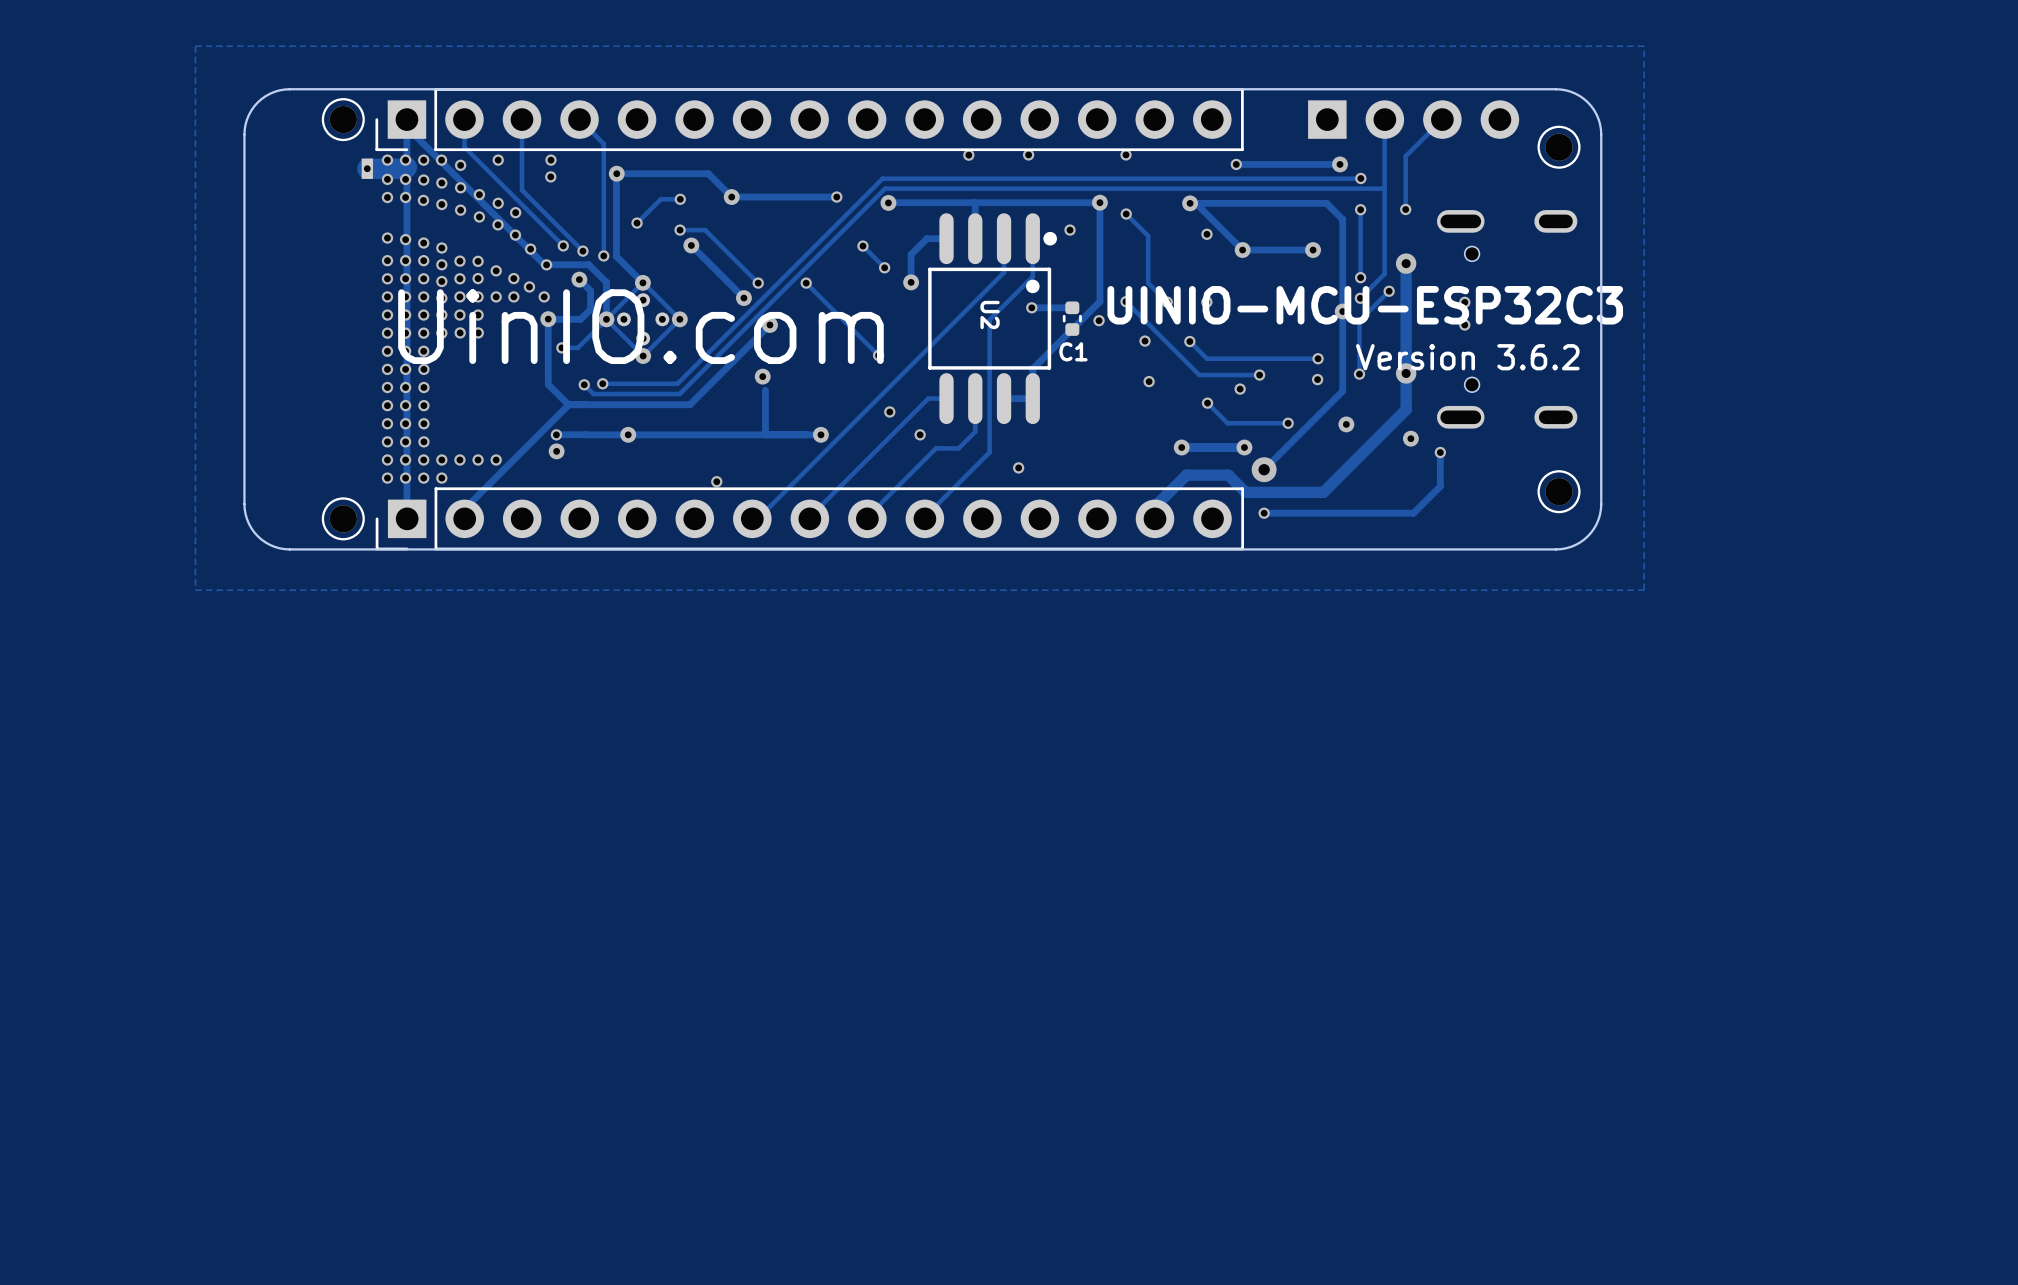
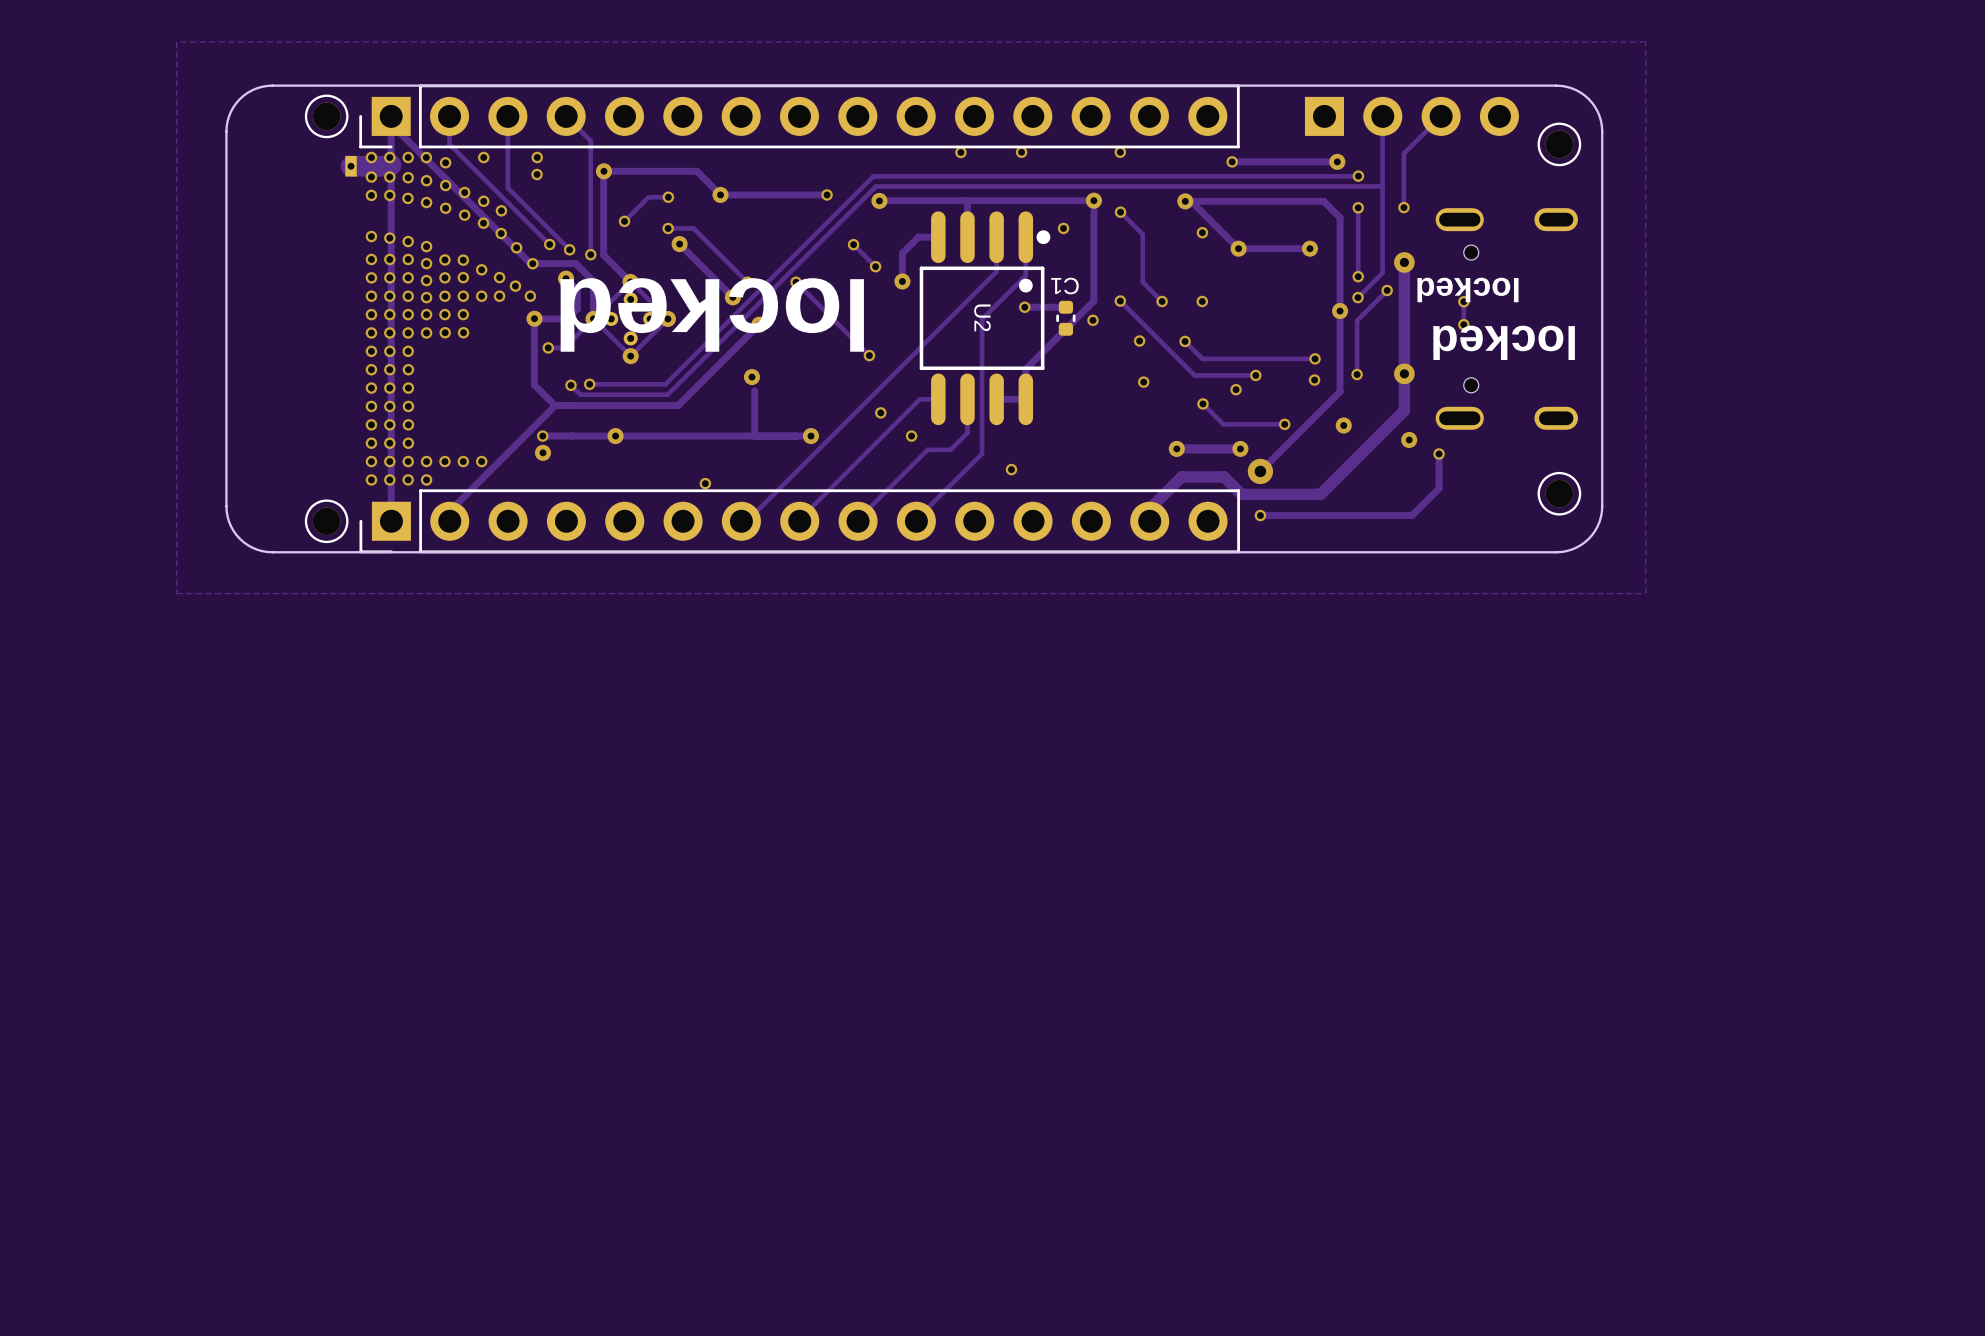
text: none -> locked (1467, 289)
text: UINIO-MCU-ESP32C3 (1365, 305) -> none
text: none -> locked (712, 314)
text: UinIO.com (640, 326) -> none
text: none -> locked (1504, 342)
C1 name rotation: 0° (1073, 351) -> 180° (1064, 286)
C1 name position: C1 (1073, 351) -> C1 (1064, 286)
text: Version 3.6.2 (1467, 357) -> none

